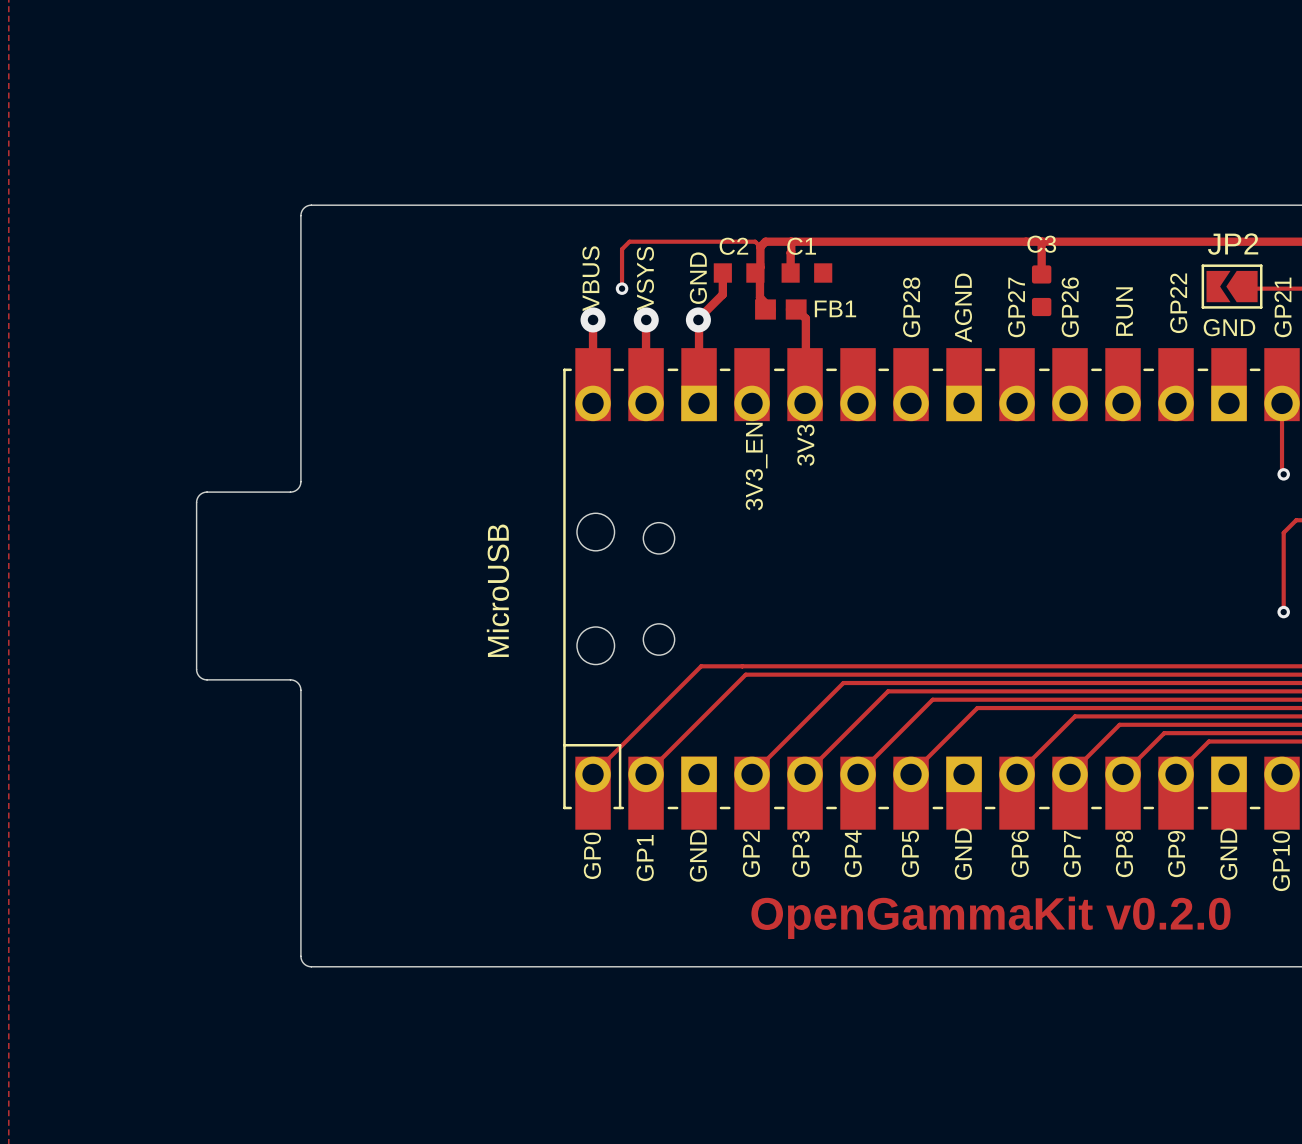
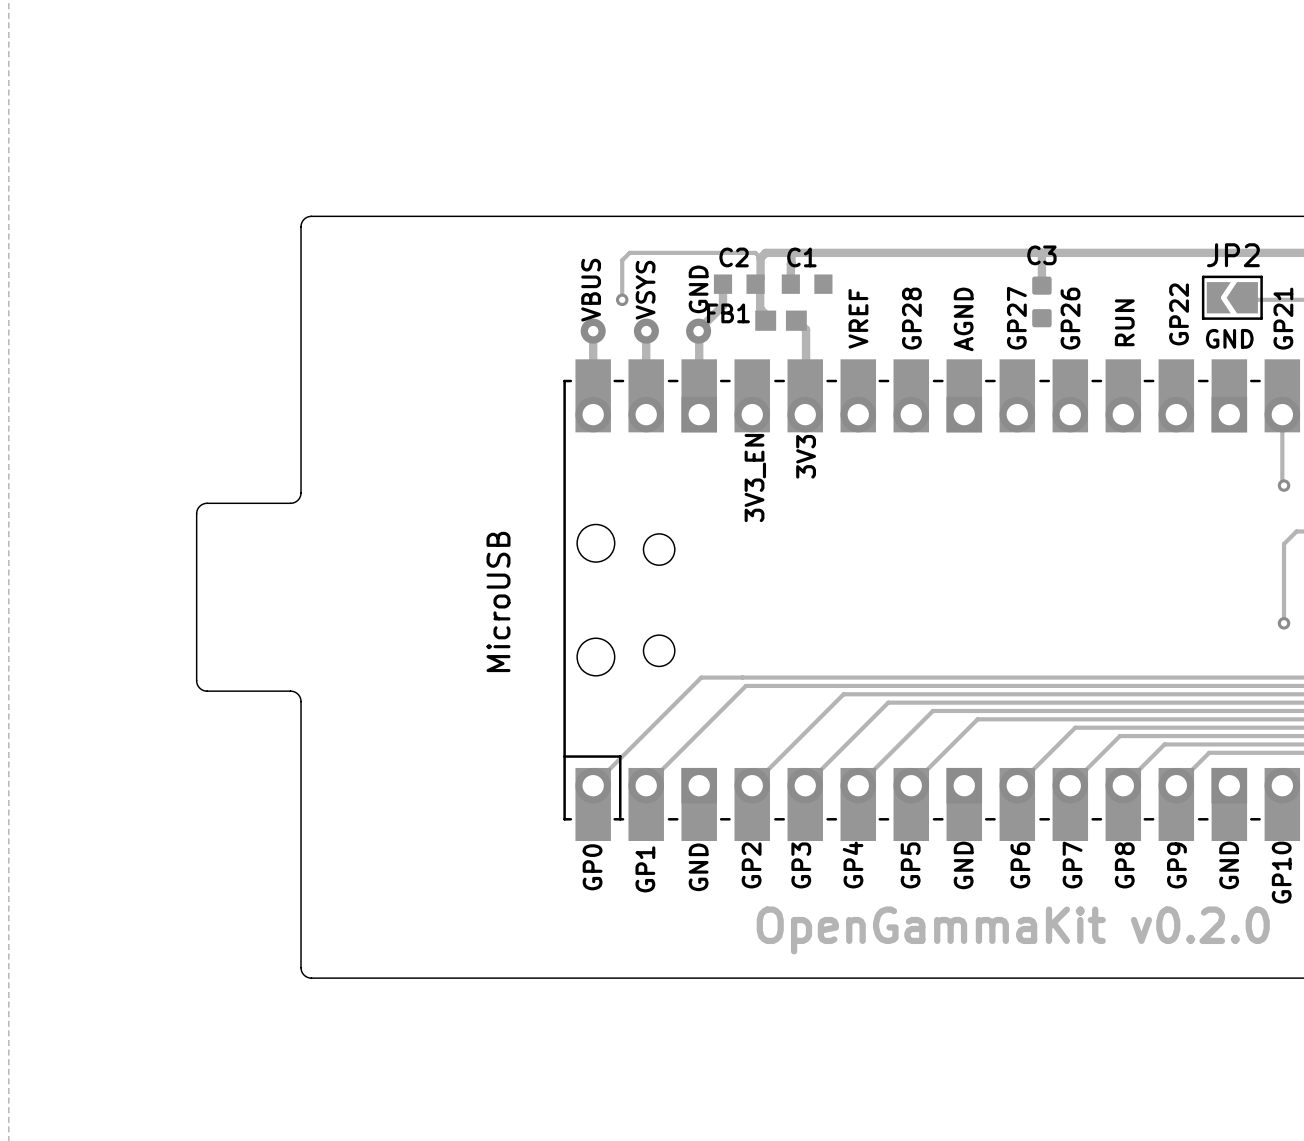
text: none -> VREF (858, 318)
FB1 name position: FB1 (835, 308) -> FB1 (728, 313)

